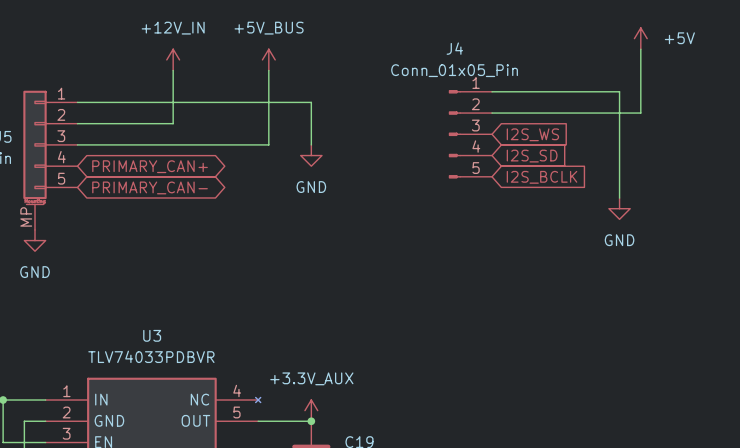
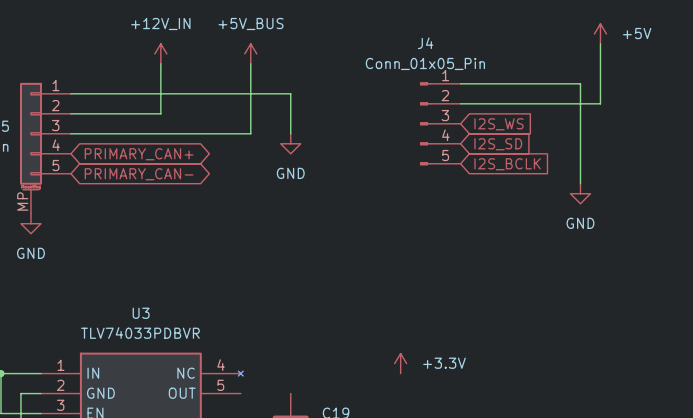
power symbol: none -> +3.3V (400, 363)
power symbol: +3.3V_AUX (311, 410) -> none
wire: (258, 421) (311, 421) -> none
junction: (311, 421) -> none

